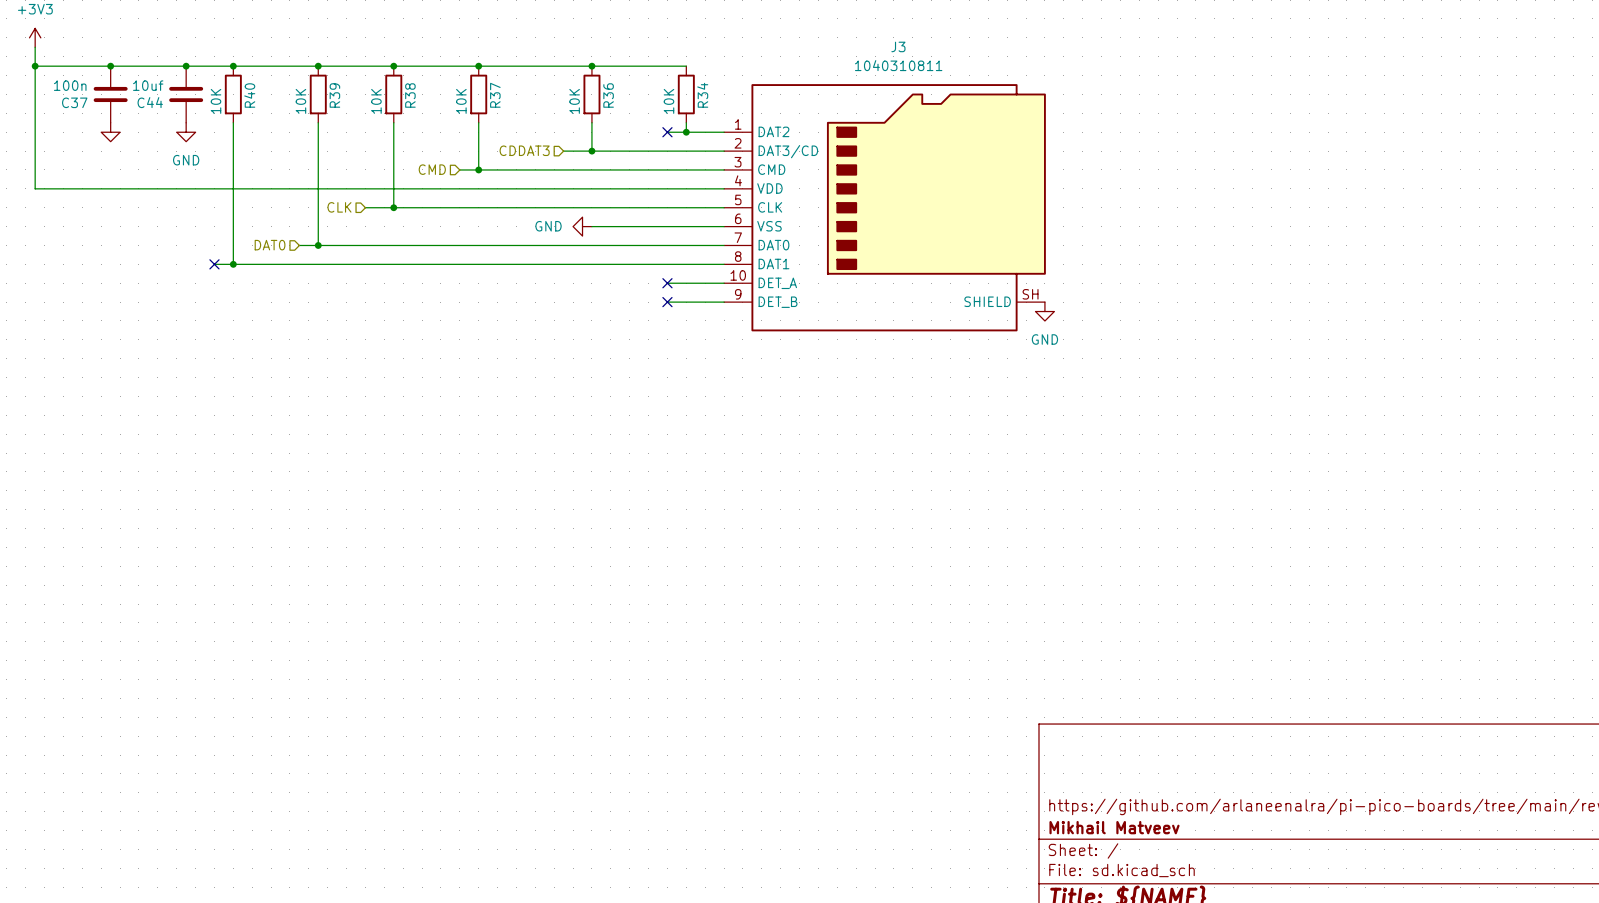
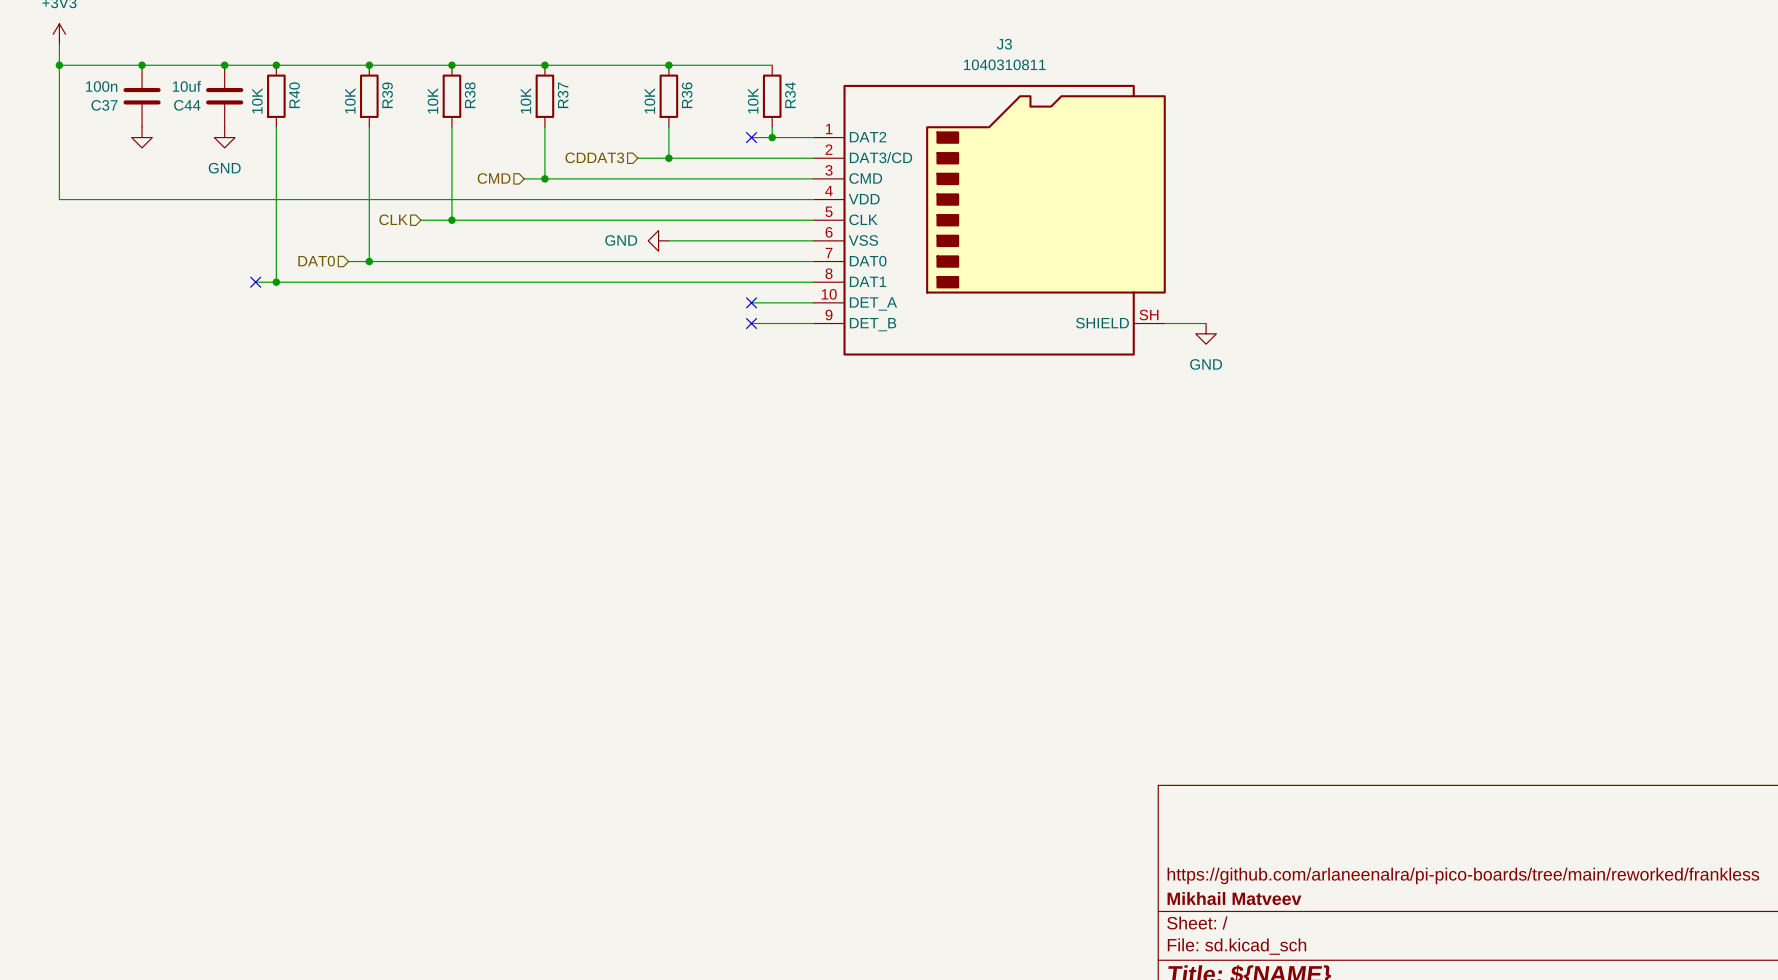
wire: none -> (1164, 323) (1206, 323)
power symbol position: GND (1044, 311) -> GND (1206, 333)

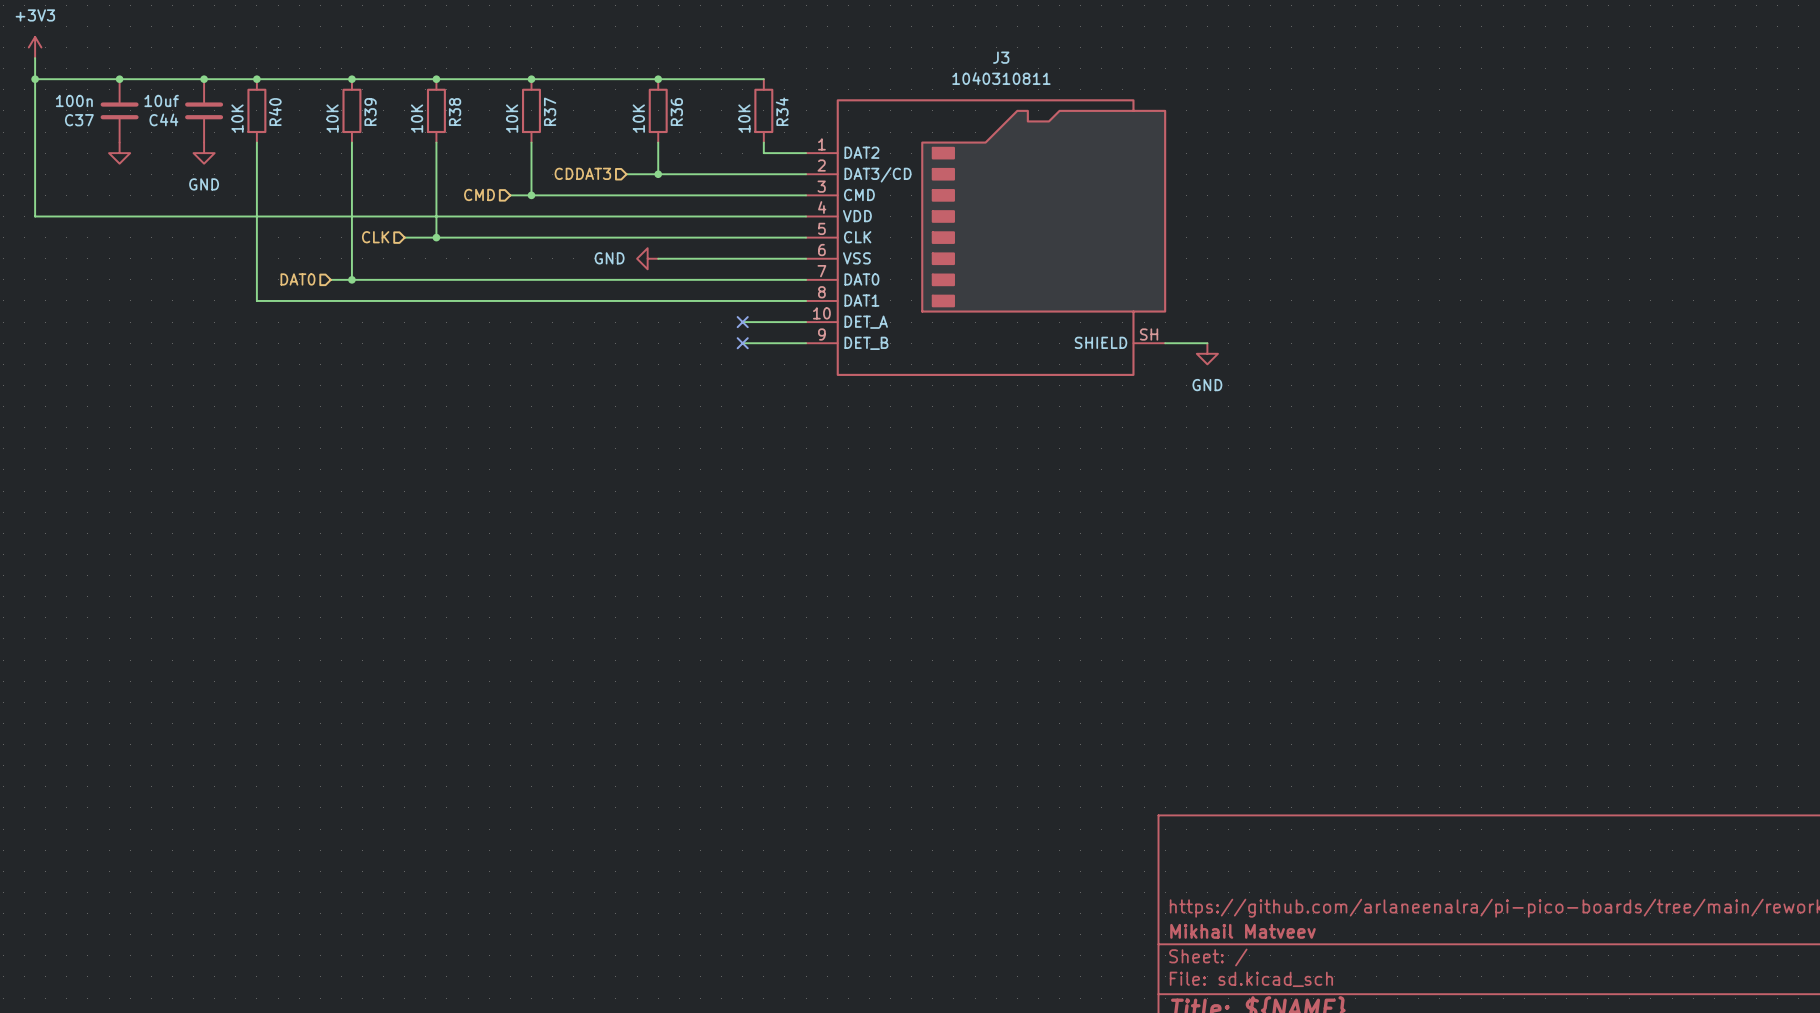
wire: (751, 137) (772, 137) -> none
no-connect mark: (751, 137) -> none
junction: (772, 137) -> none
wire: (255, 282) (276, 282) -> none
no-connect mark: (255, 282) -> none
junction: (276, 282) -> none

